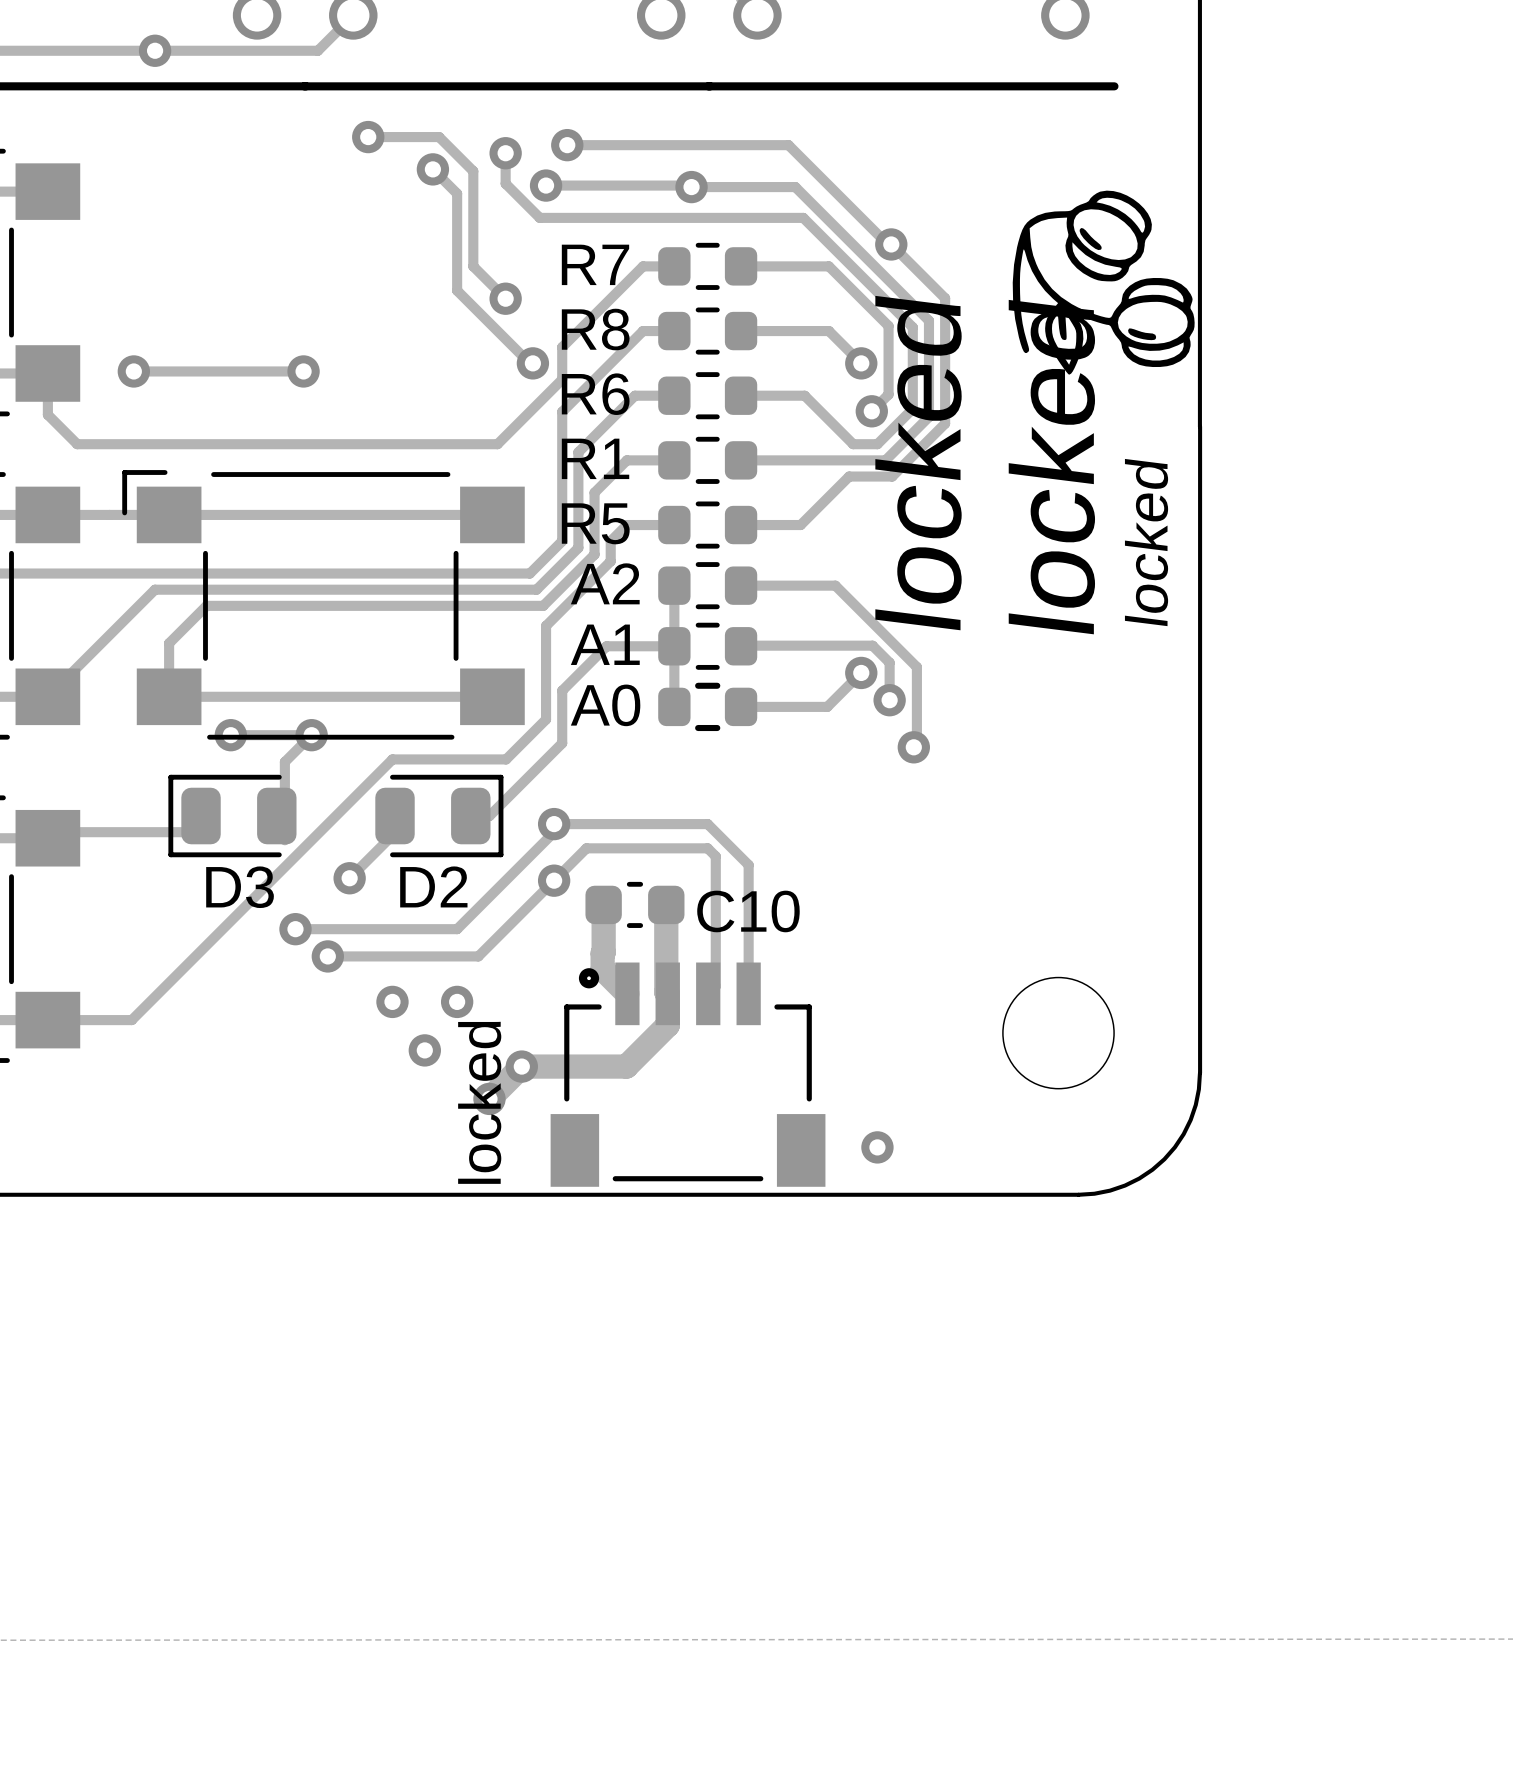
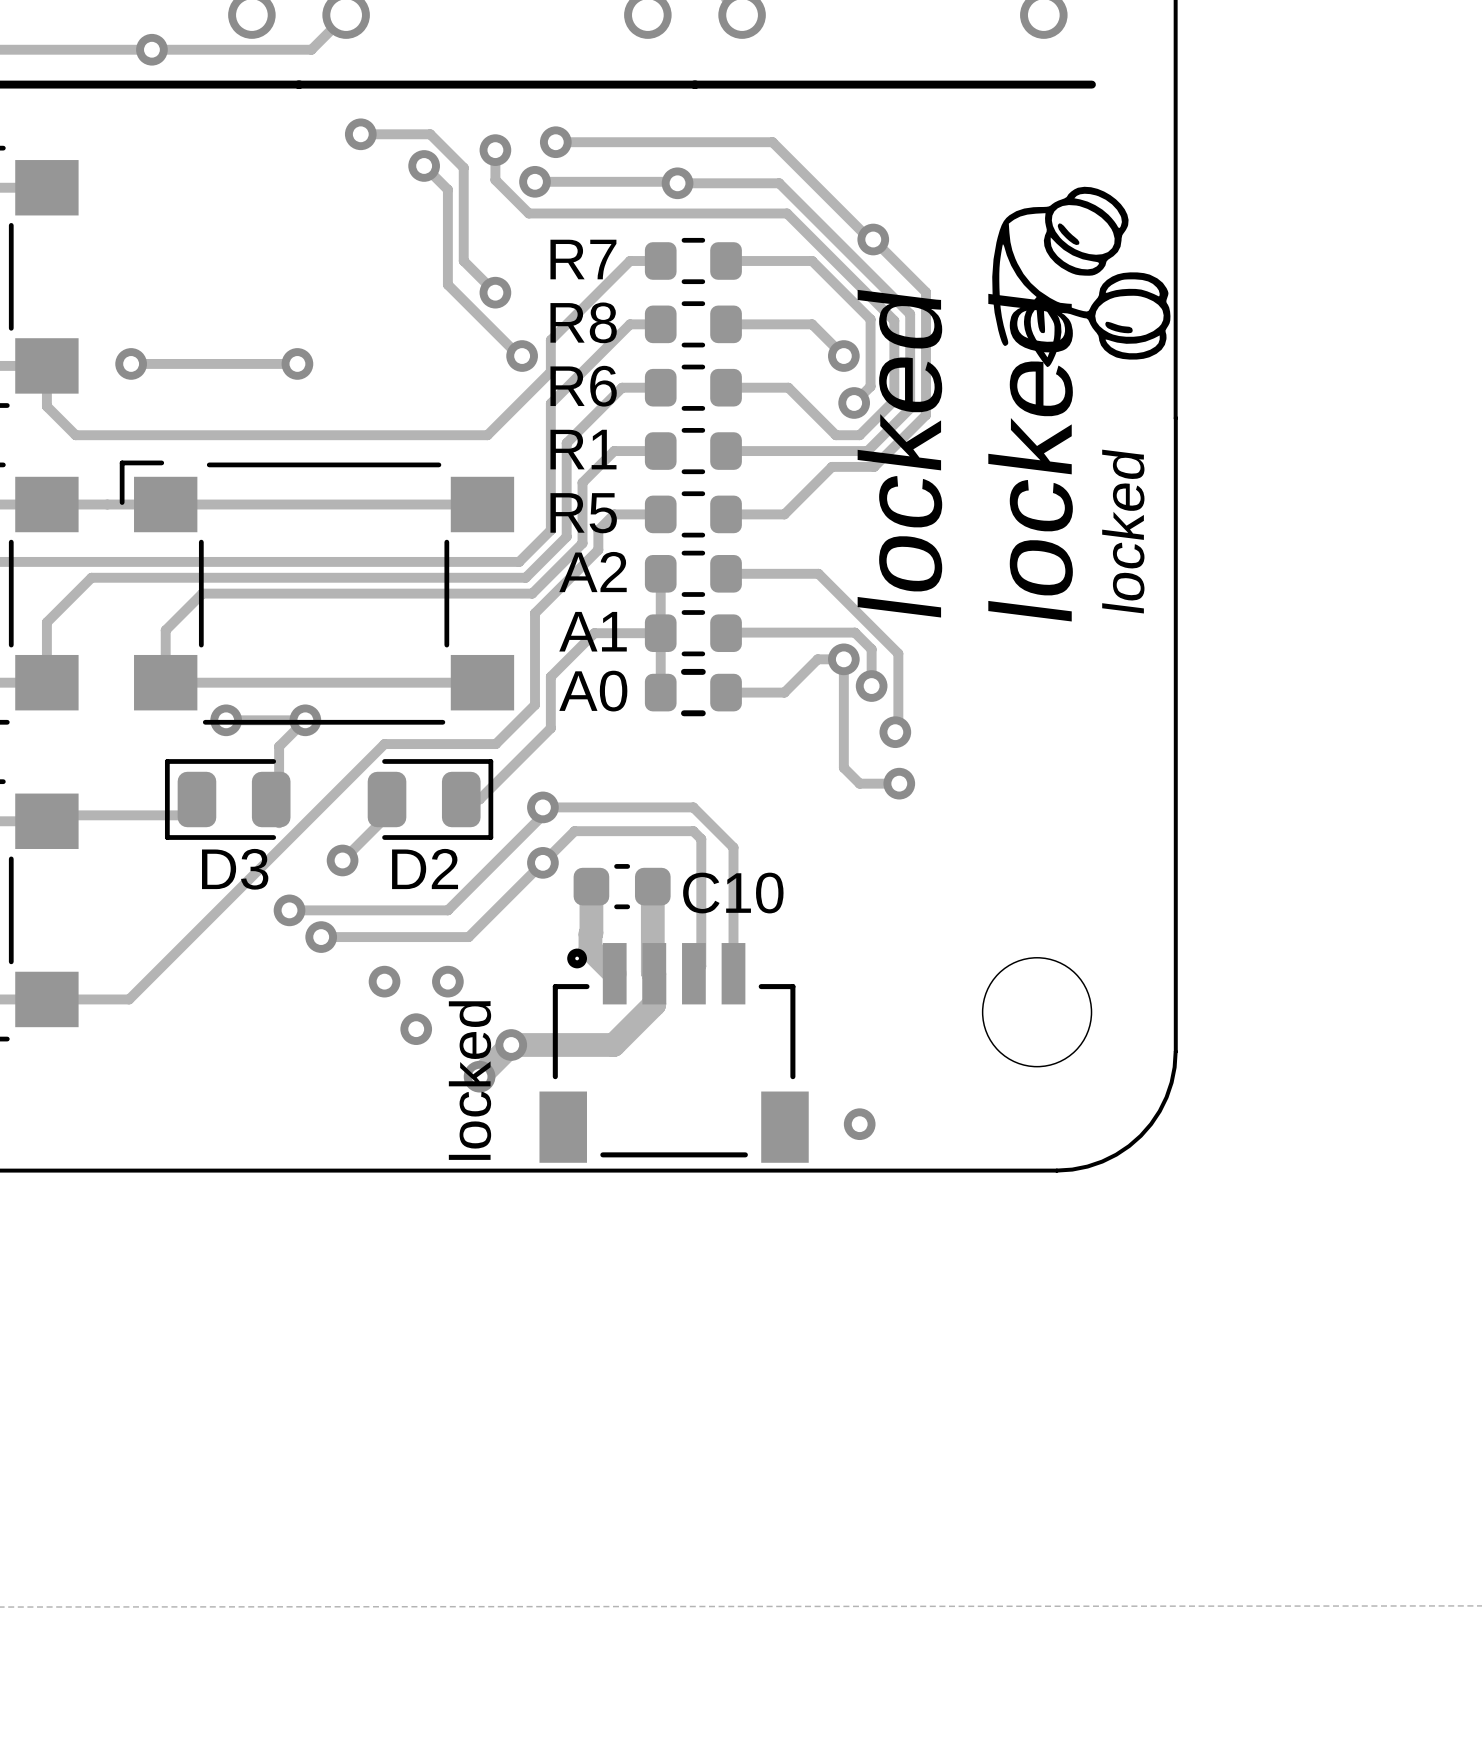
track: (154, 589) (47, 696) -> (151, 577) (91, 577) (46, 622) (46, 682)
track: (861, 672) (827, 706) (800, 706) -> (899, 783) (859, 783) (843, 767) (843, 659) (817, 659) (784, 692)
via: none -> (899, 783)

